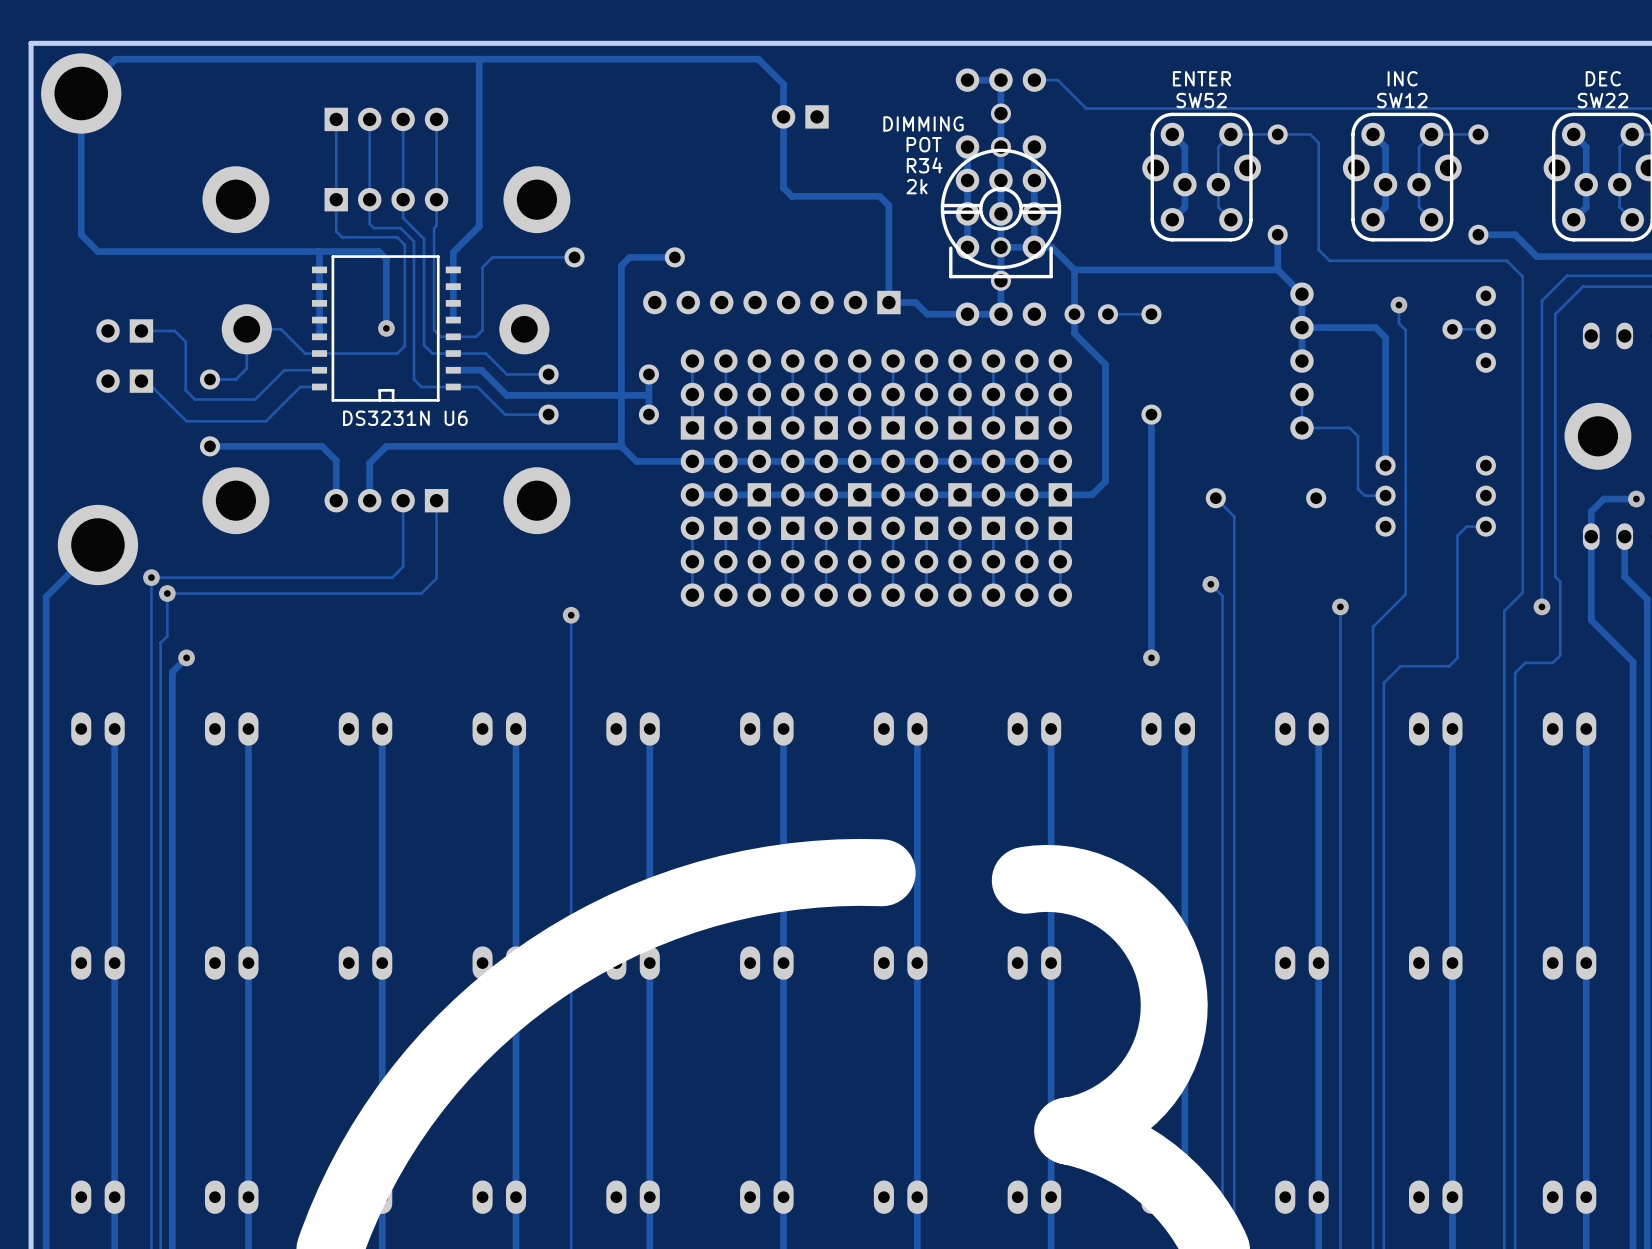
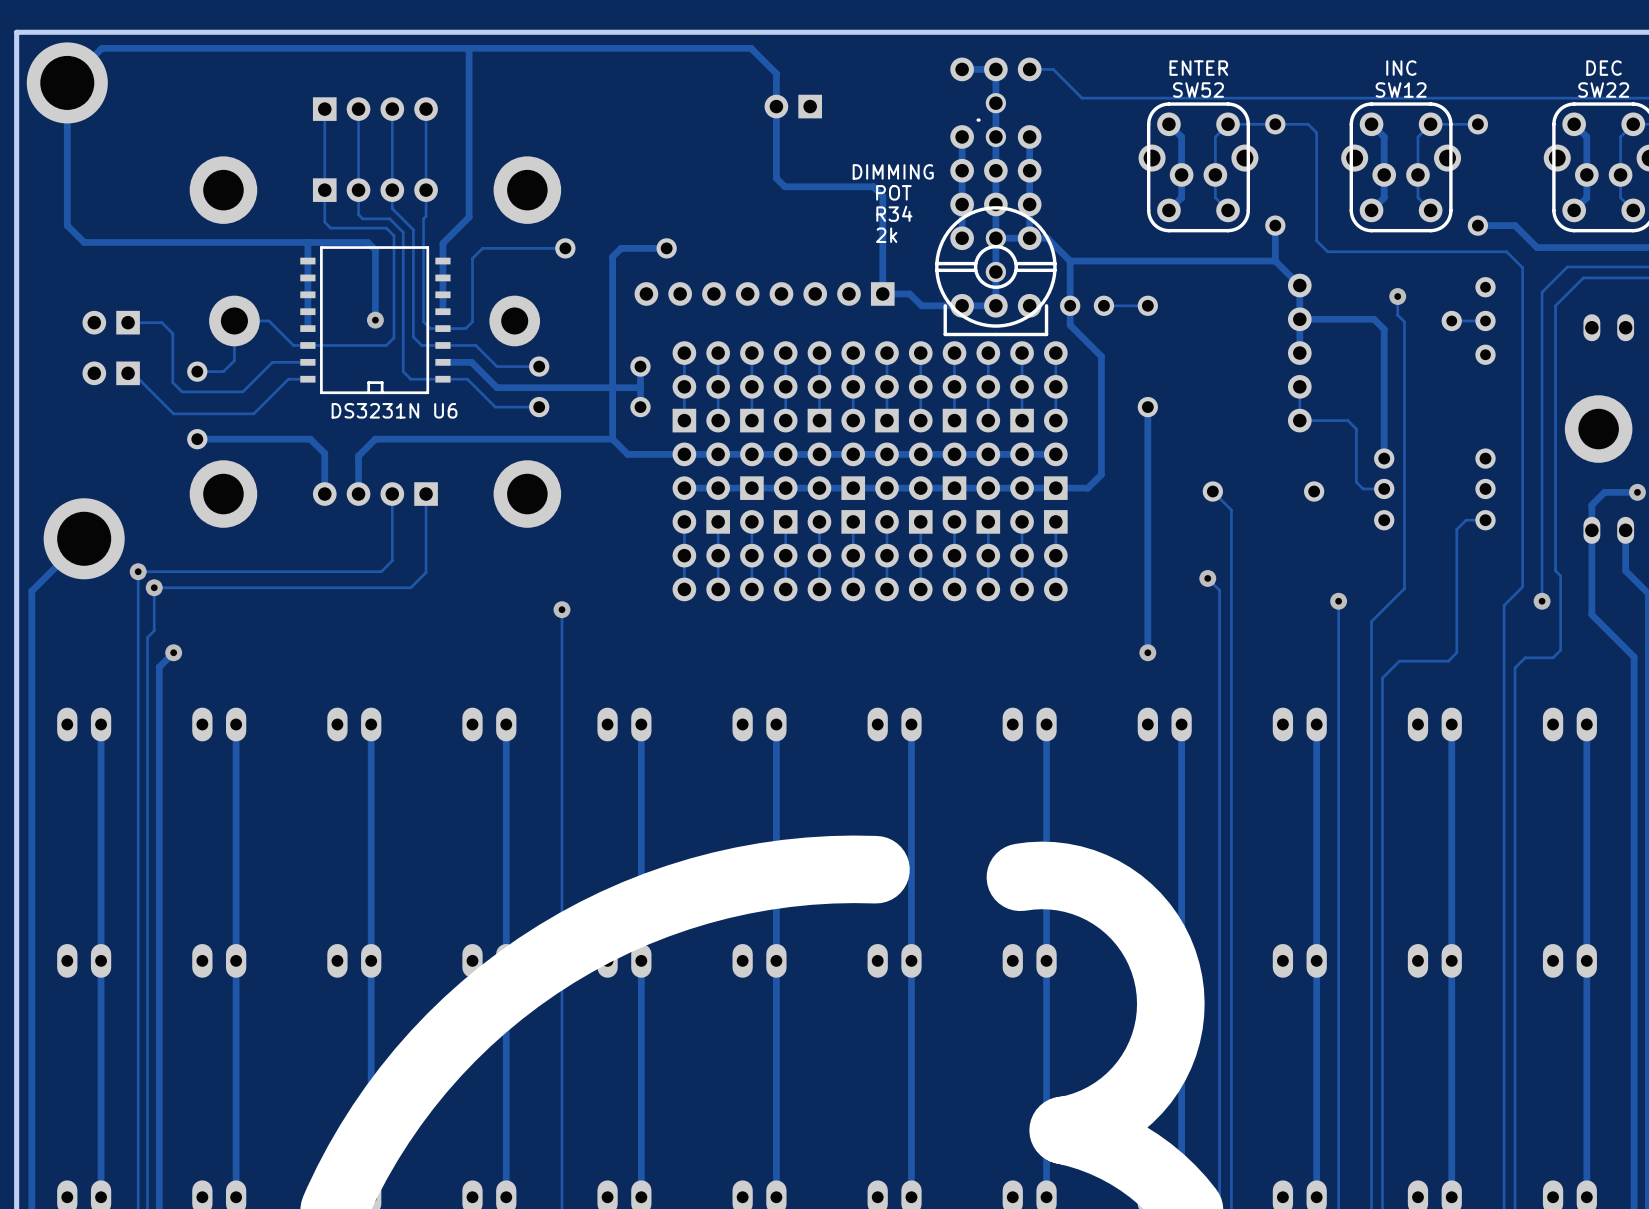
R34 footprint: [940, 68, 1062, 326] -> [935, 57, 1057, 337]
text position: DIMMING (923, 123) -> DIMMING (893, 171)
line: none -> (979, 120) (978, 120)
text position: POT (924, 144) -> POT (893, 192)
R34 name position: R34 (924, 165) -> R34 (894, 213)
R34 value position: 2k (917, 186) -> 2k (886, 235)

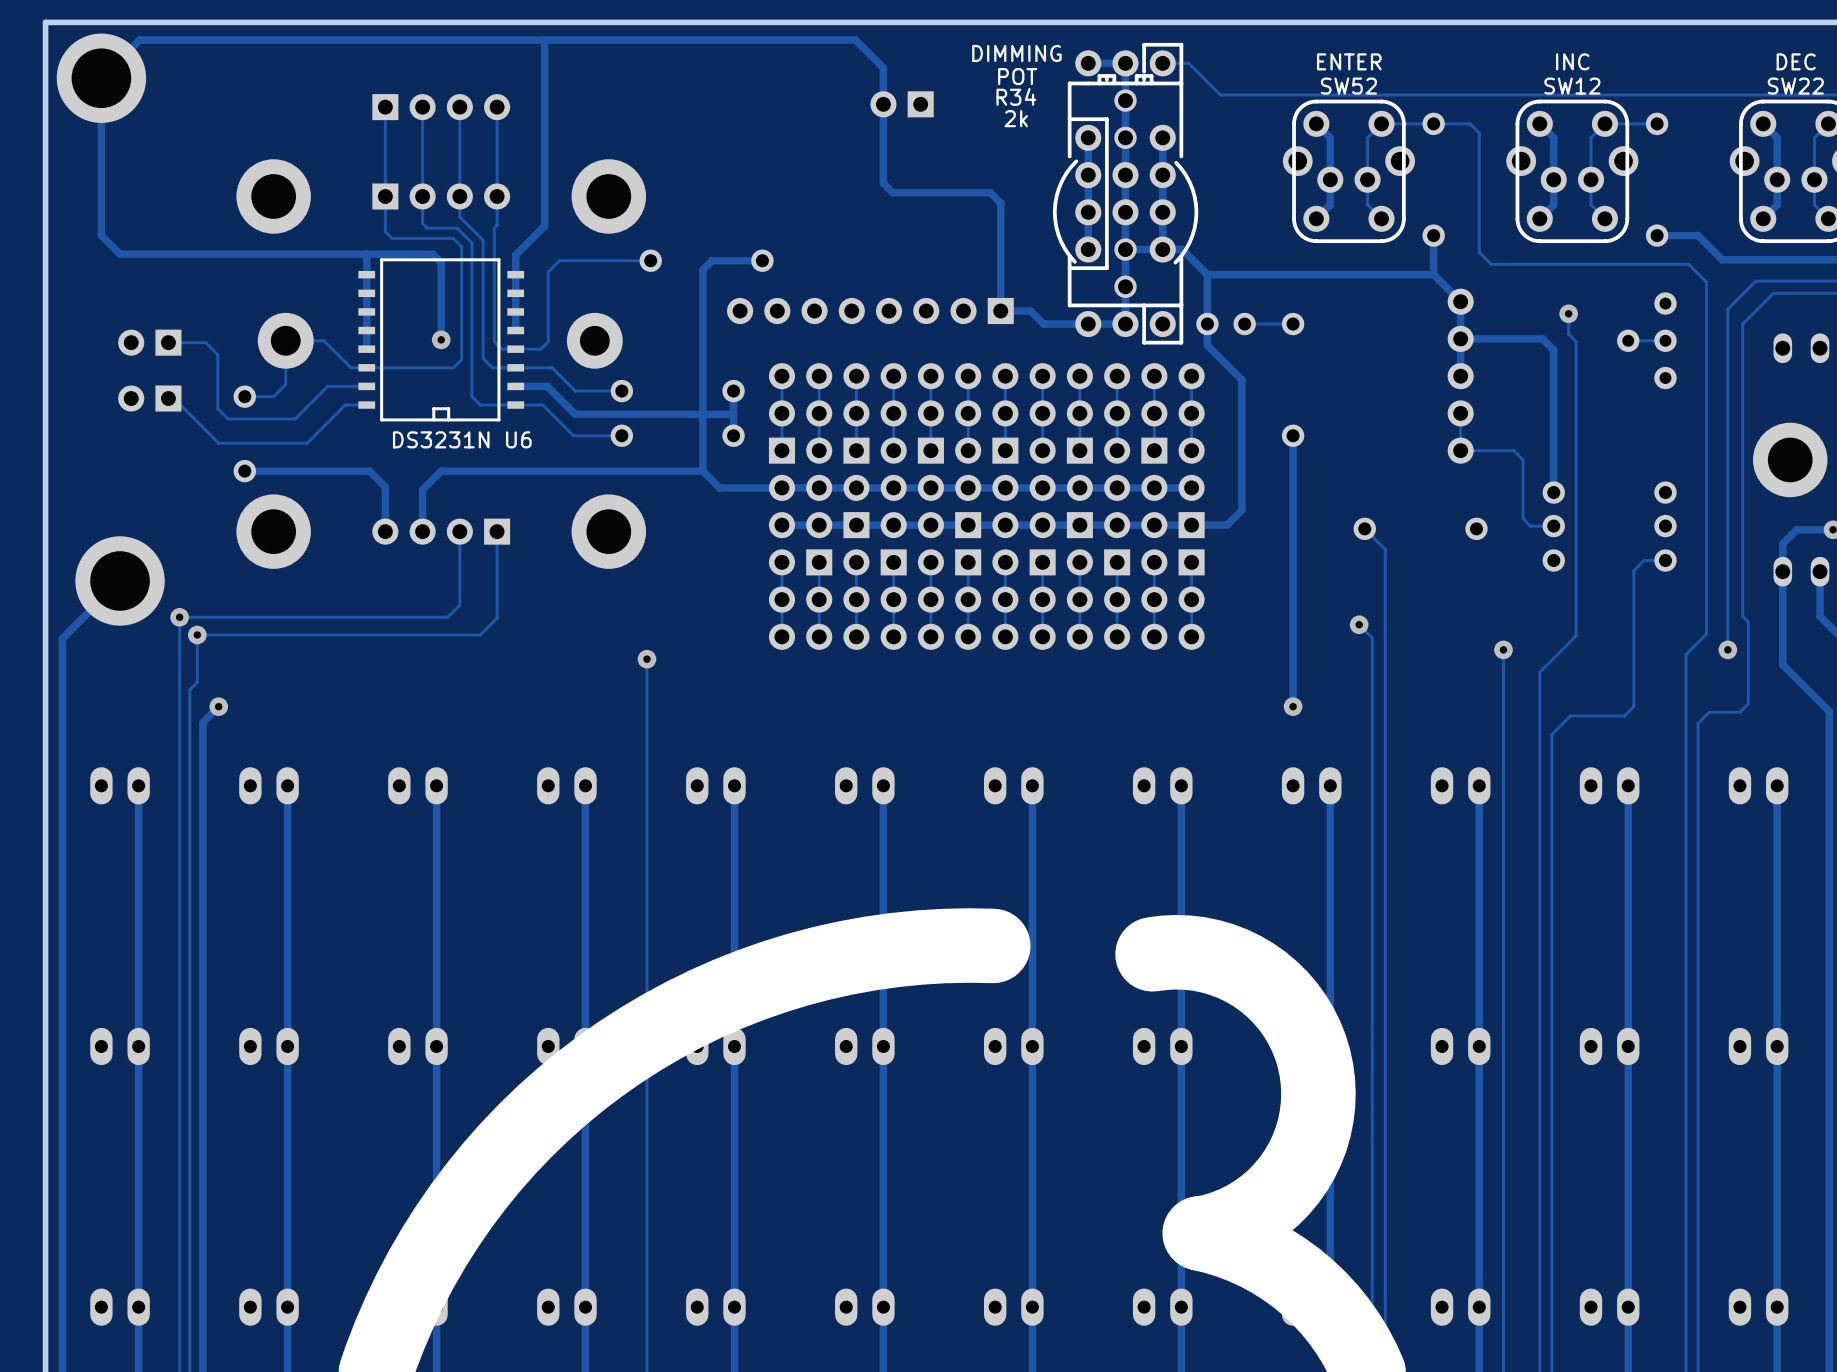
R34 footprint: [935, 57, 1057, 337] -> [1052, 50, 1199, 338]
line: none -> (1144, 71) (1144, 44) (1181, 44) (1181, 83)
line: none -> (1105, 119) (1069, 119)
line: none -> (1106, 119) (1106, 268) (1069, 268)
text position: DIMMING (893, 171) -> DIMMING (1016, 53)
text position: POT (893, 192) -> POT (1017, 76)
R34 name position: R34 (894, 213) -> R34 (1016, 96)
R34 value position: 2k (886, 235) -> 2k (1016, 118)
line: none -> (1181, 304) (1181, 342) (1144, 342) (1144, 305)

